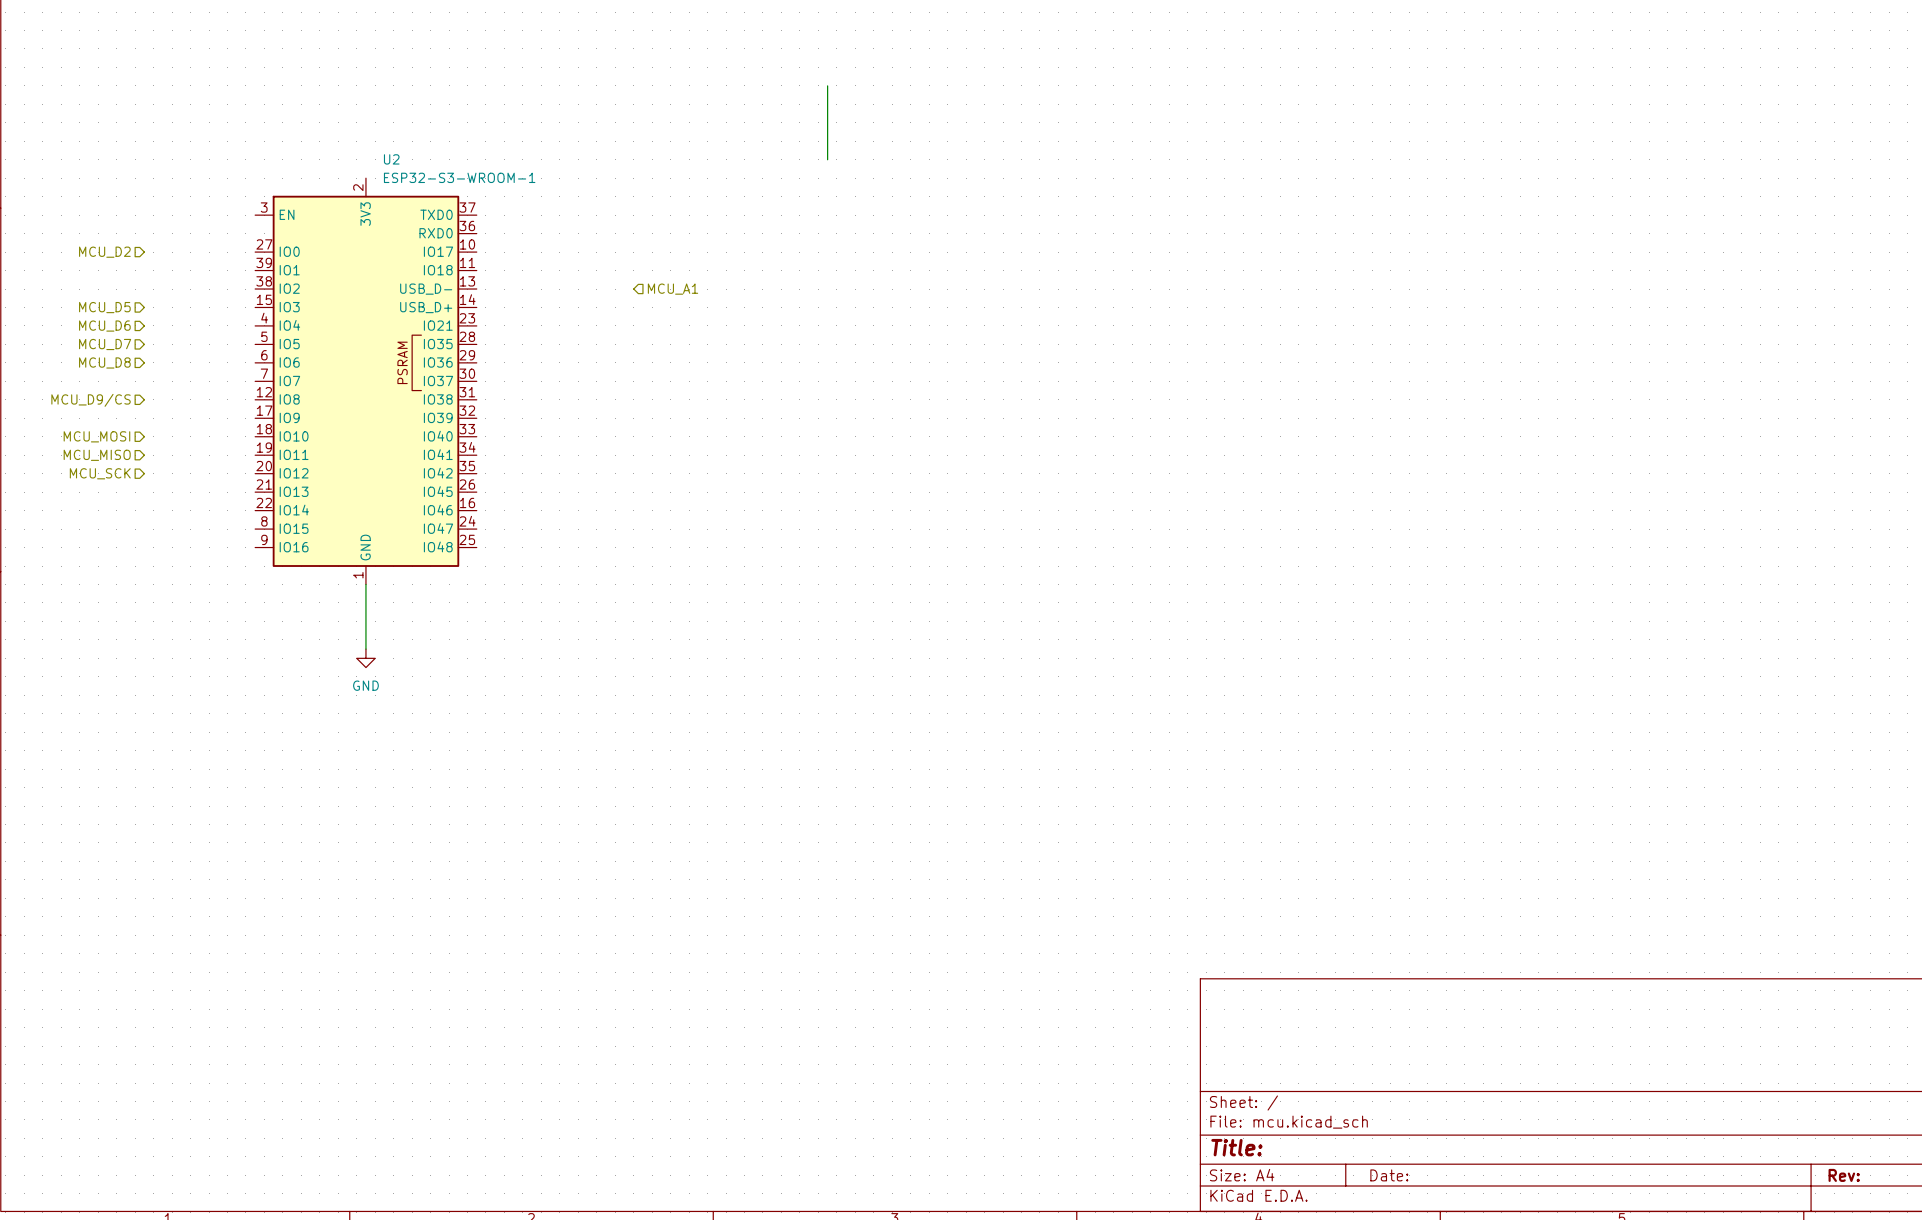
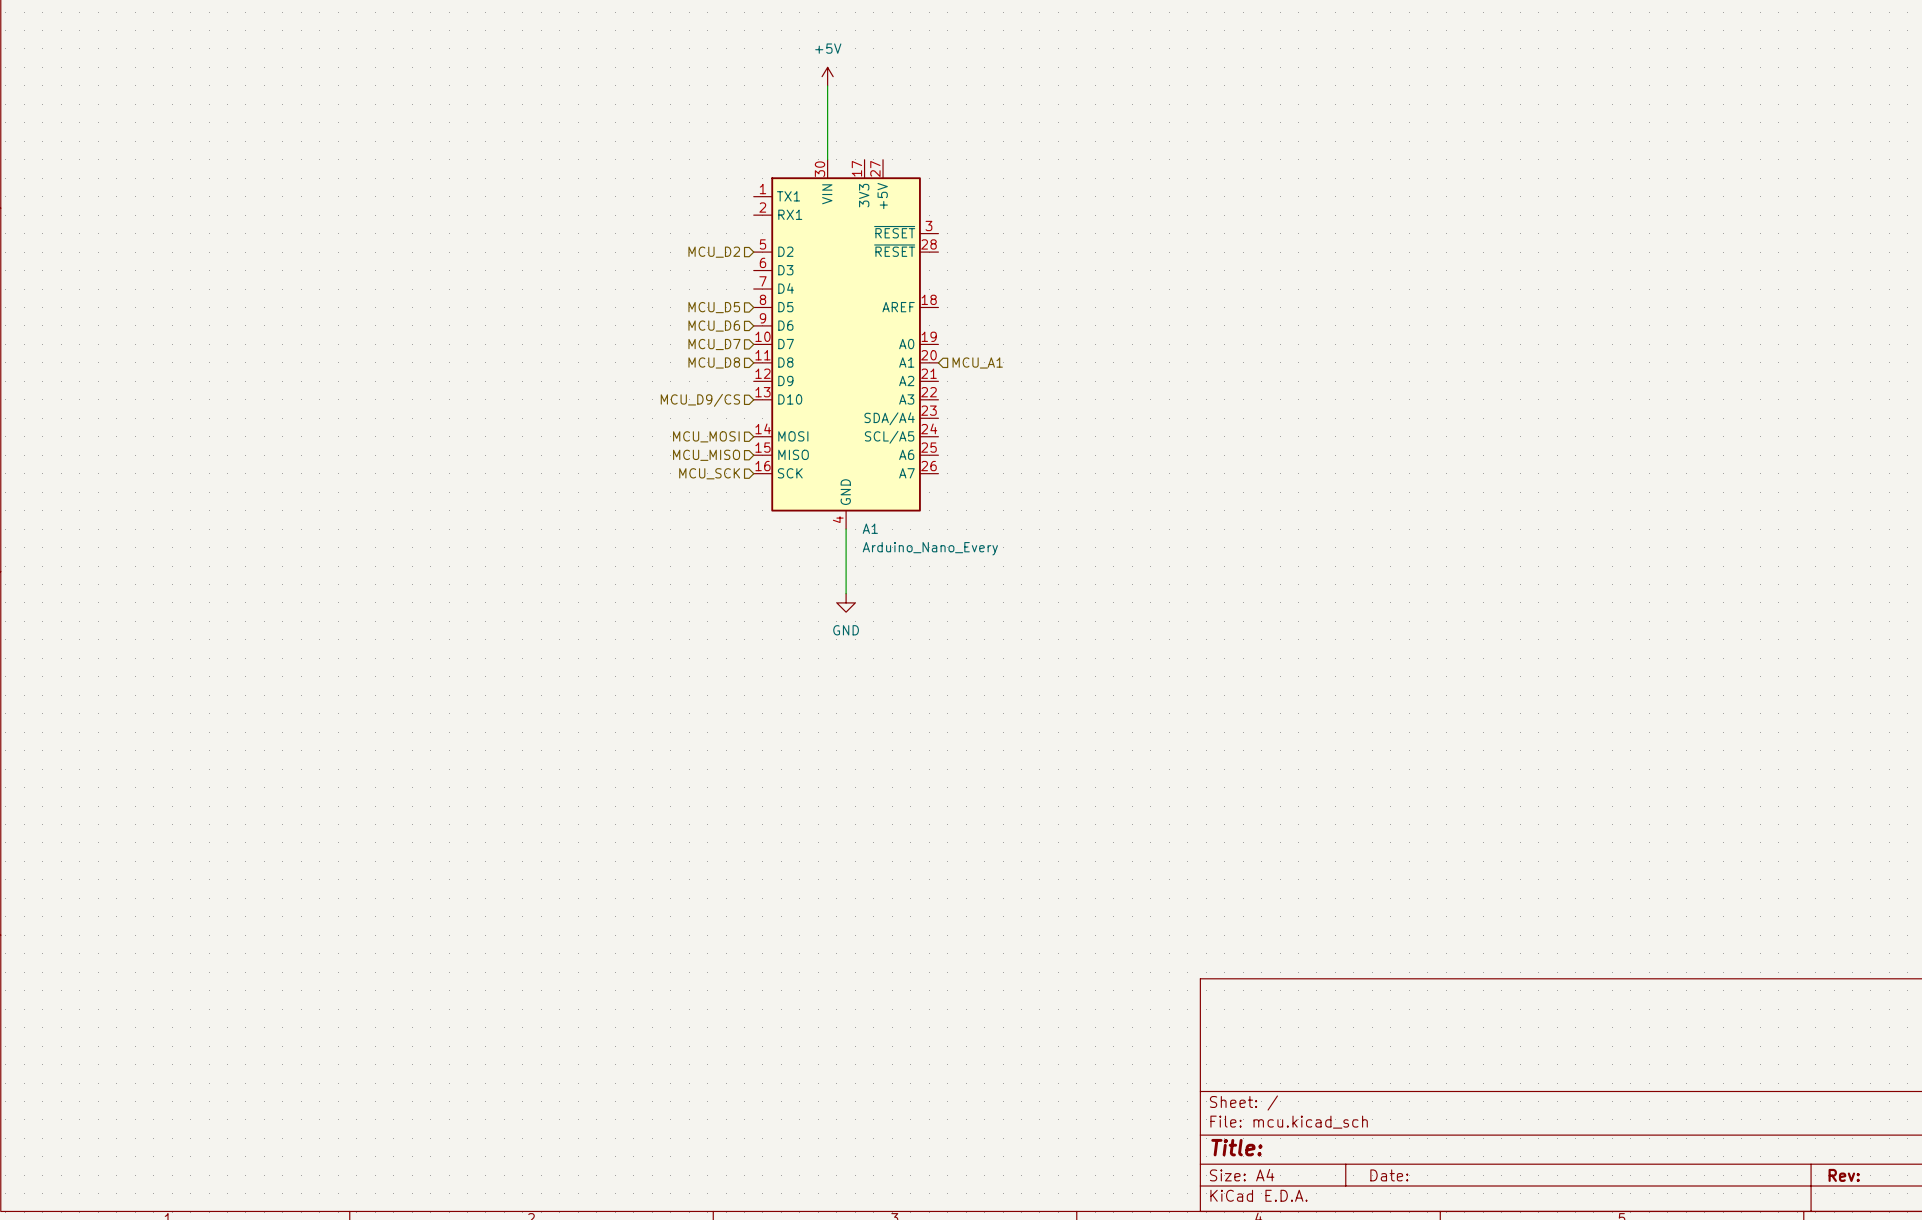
power symbol: none -> +5V (827, 76)
hierarchical label: MCU_D2 (104, 252) -> none
hierarchical label: none -> MCU_D2 (714, 252)
hierarchical label: MCU_A1 (673, 289) -> MCU_D5 (714, 307)
hierarchical label: MCU_D5 (104, 307) -> none
hierarchical label: MCU_D6 (104, 326) -> none
hierarchical label: none -> MCU_D6 (714, 326)
hierarchical label: MCU_D7 (105, 344) -> none
hierarchical label: none -> MCU_D7 (714, 344)
A1: none -> Arduino_Nano_Every (846, 344)
hierarchical label: MCU_D8 (104, 362) -> none
hierarchical label: none -> MCU_D8 (714, 362)
hierarchical label: none -> MCU_A1 (977, 362)
U2: ESP32-S3-WROOM-1 (365, 381) -> none
hierarchical label: MCU_D9/CS (91, 400) -> none
hierarchical label: none -> MCU_D9/CS (700, 400)
hierarchical label: MCU_MOSI (96, 436) -> none
hierarchical label: none -> MCU_MOSI (706, 436)
hierarchical label: MCU_MISO (97, 455) -> none
hierarchical label: none -> MCU_MISO (706, 455)
hierarchical label: MCU_SCK (100, 473) -> none
hierarchical label: none -> MCU_SCK (709, 473)
wire: none -> (846, 529) (846, 593)
wire: (365, 584) (365, 649) -> none
power symbol: none -> GND (846, 602)
power symbol: GND (365, 658) -> none

